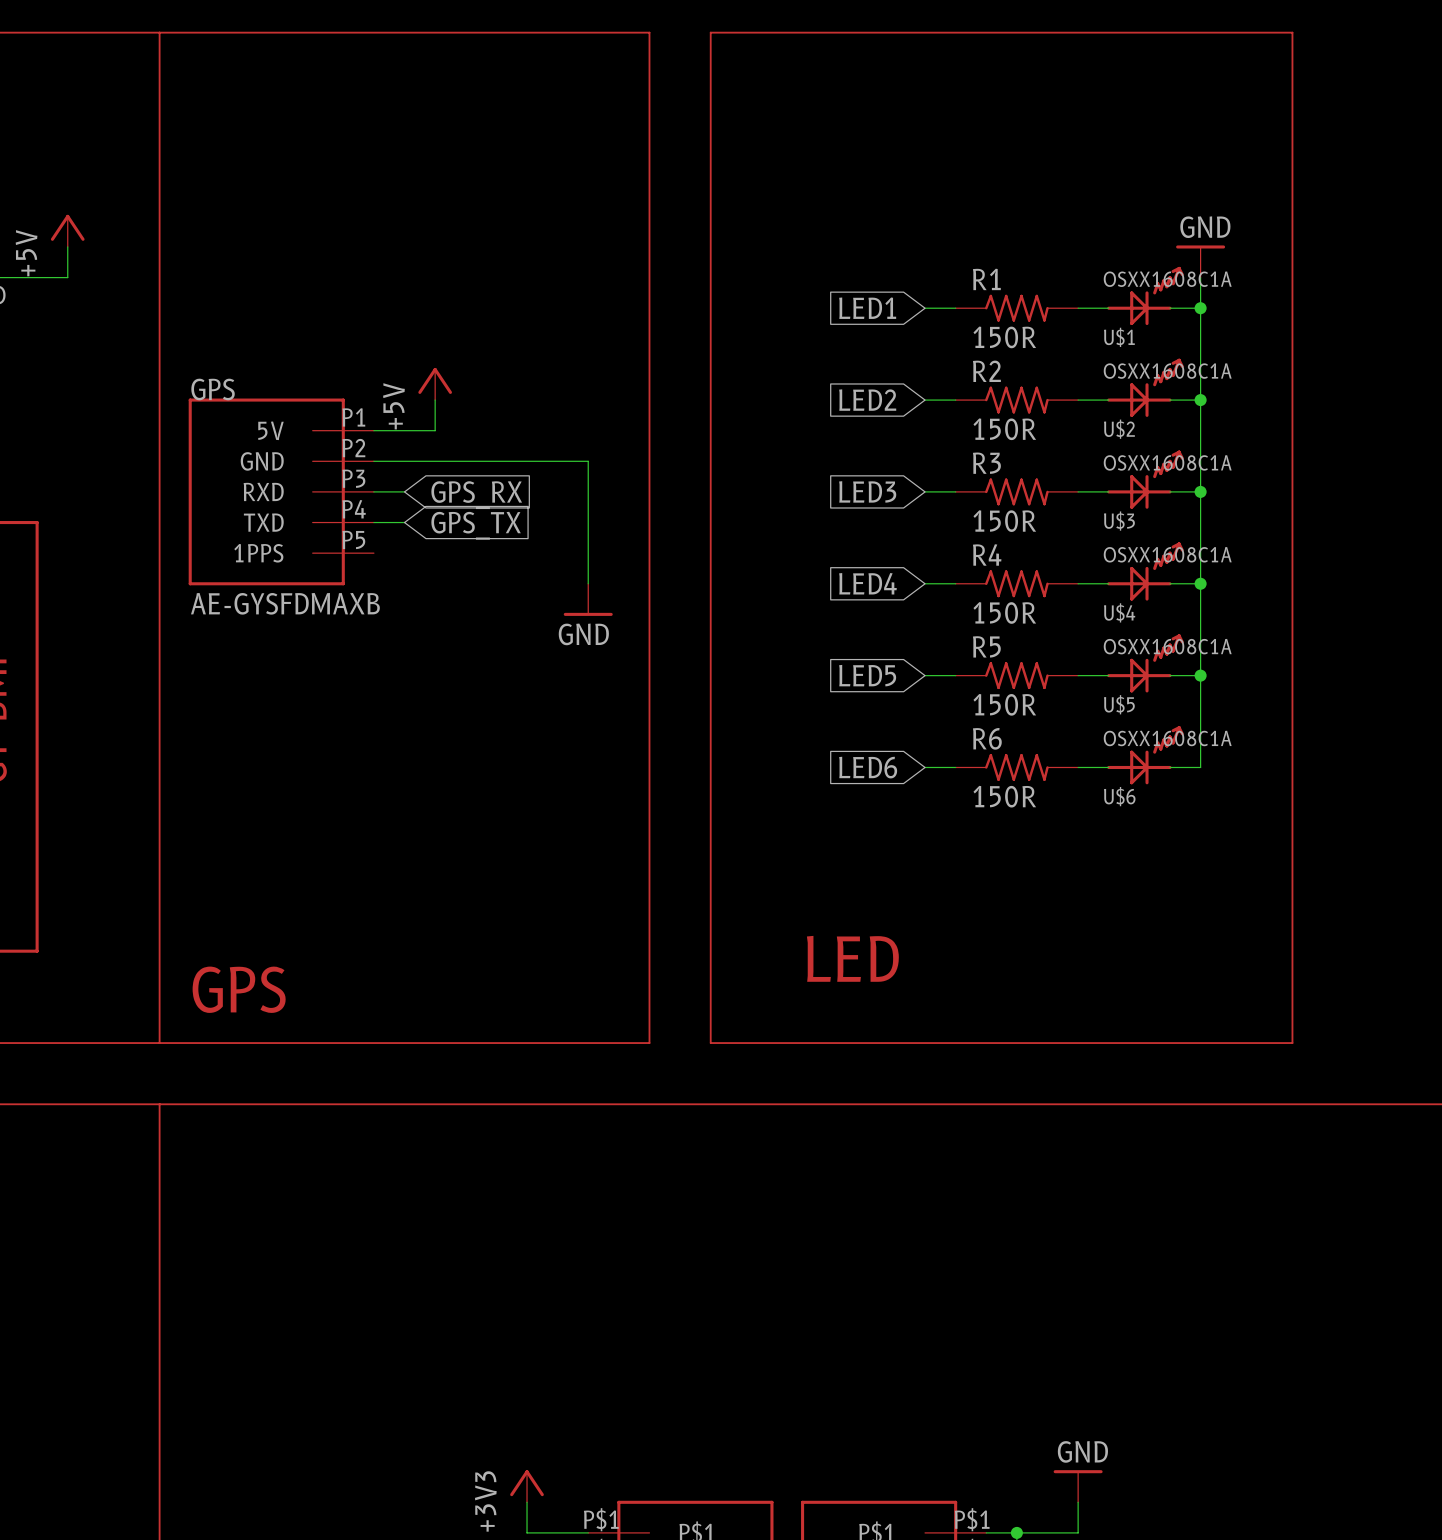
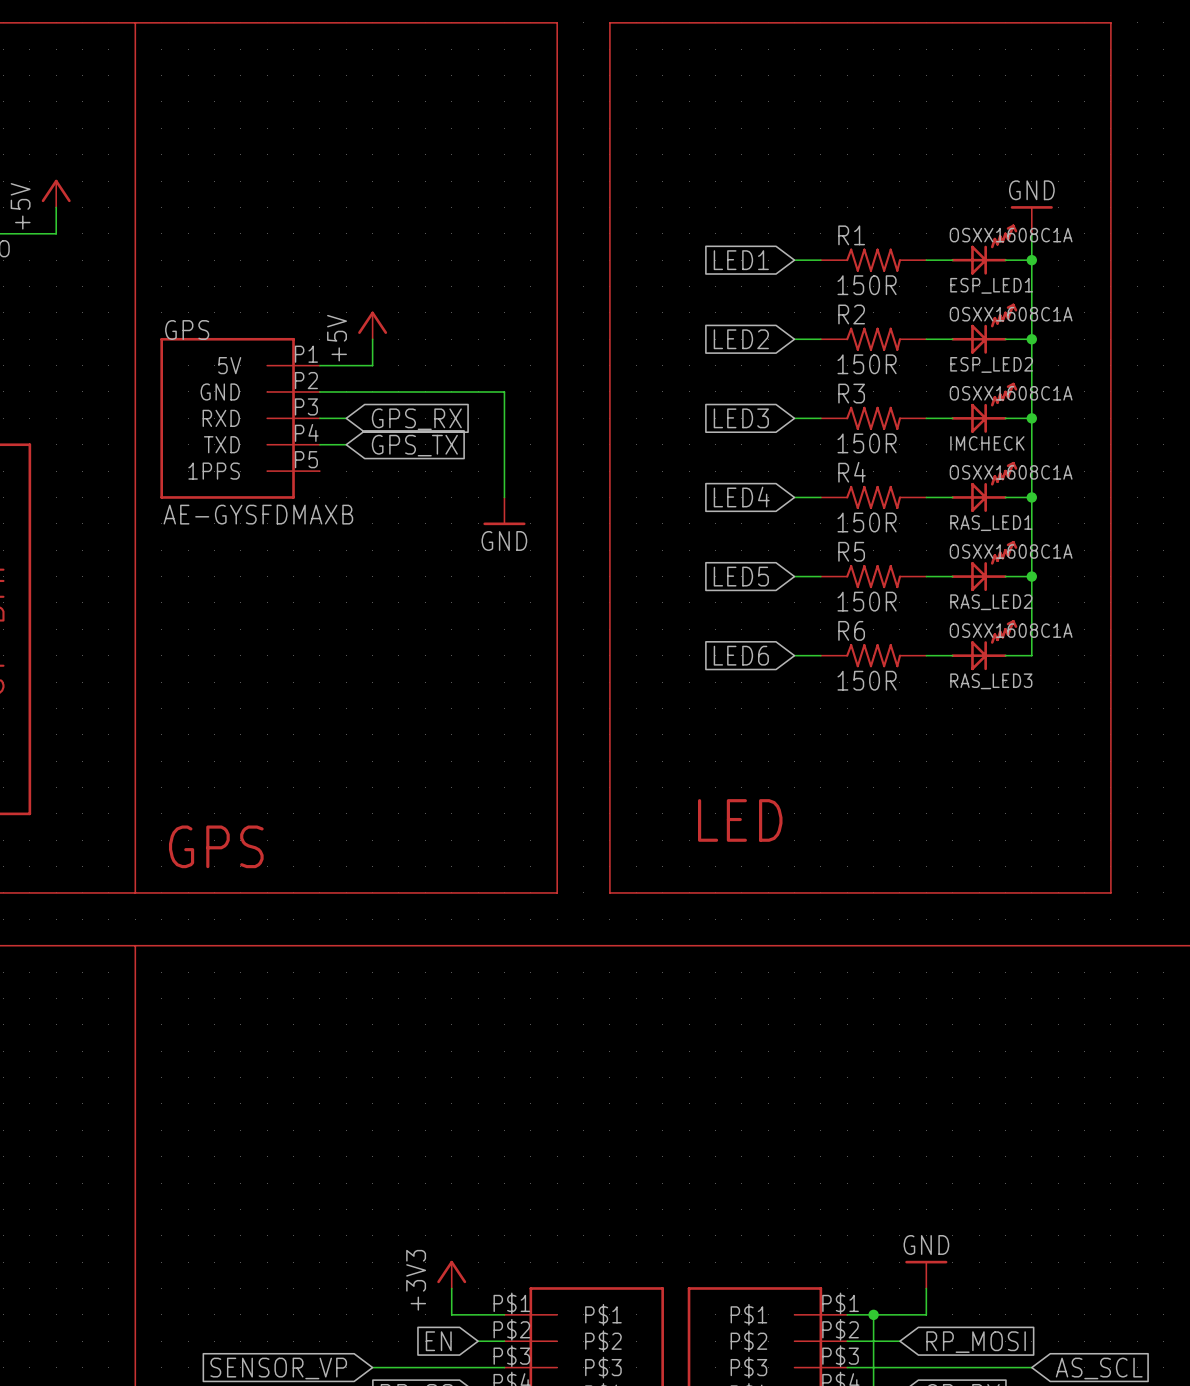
U$1 name: U$1 (1119, 337) -> ESP_LED1 (991, 285)
U$2 name: U$2 (1119, 429) -> ESP_LED2 (991, 364)
U$3 name: U$3 (1119, 521) -> IMCHECK (987, 443)
U$4 name: U$4 (1119, 612) -> RAS_LED1 (991, 523)
U$5 name: U$5 (1119, 704) -> RAS_LED2 (991, 602)
U$6 name: U$6 (1119, 796) -> RAS_LED3 (991, 681)

